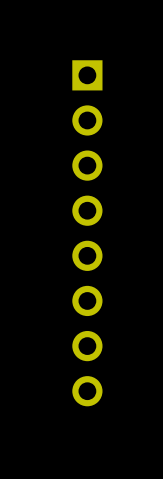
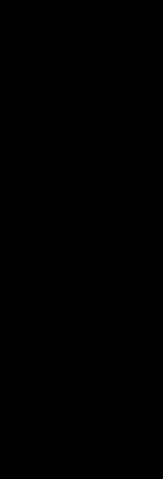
part: (87, 233) -> none

